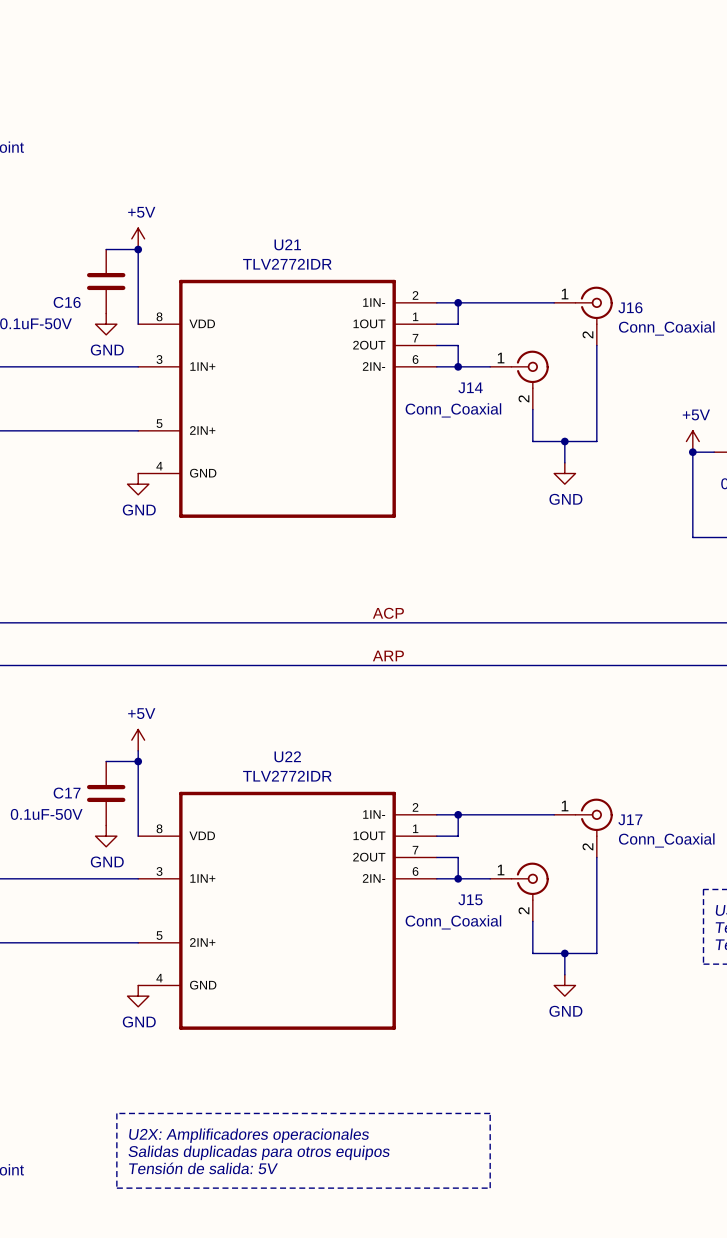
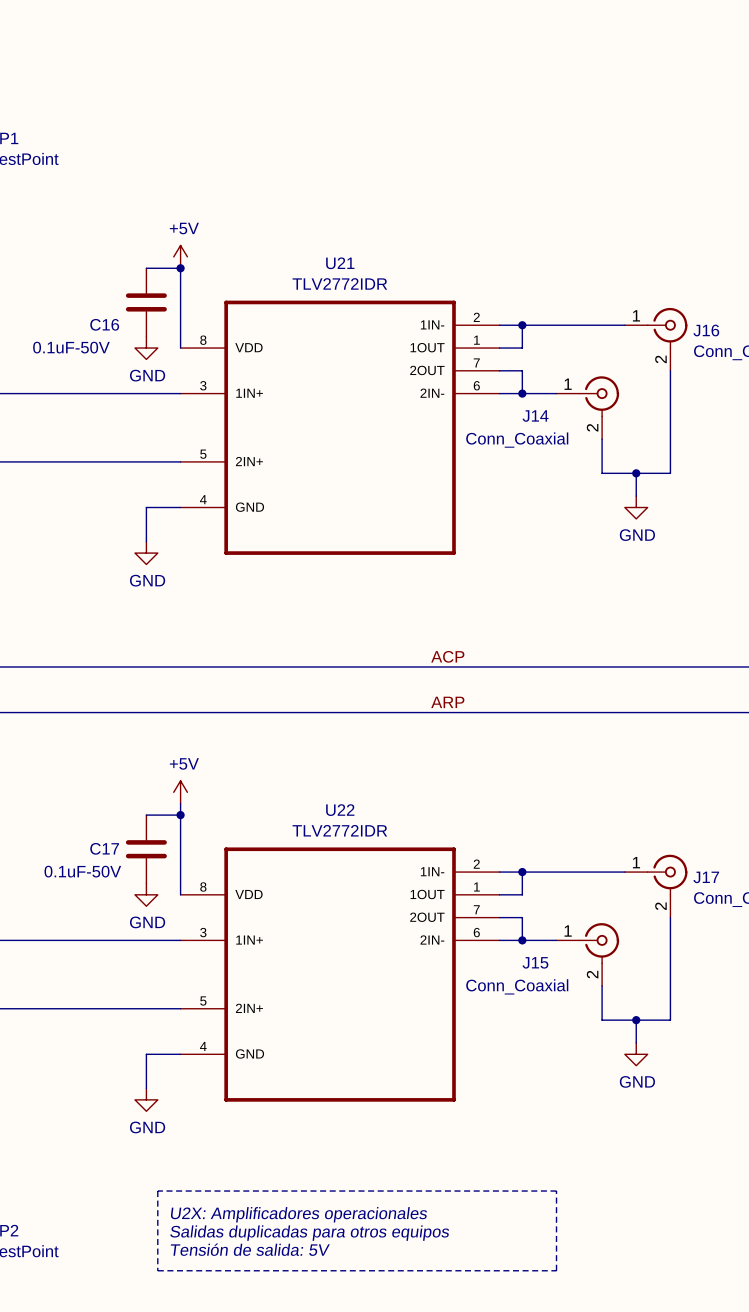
wire: none -> (180, 507) (146, 507) (146, 541)
power symbol position: GND (138, 484) -> GND (146, 553)
wire: none -> (180, 1054) (146, 1054) (146, 1088)
power symbol position: GND (138, 996) -> GND (146, 1099)

